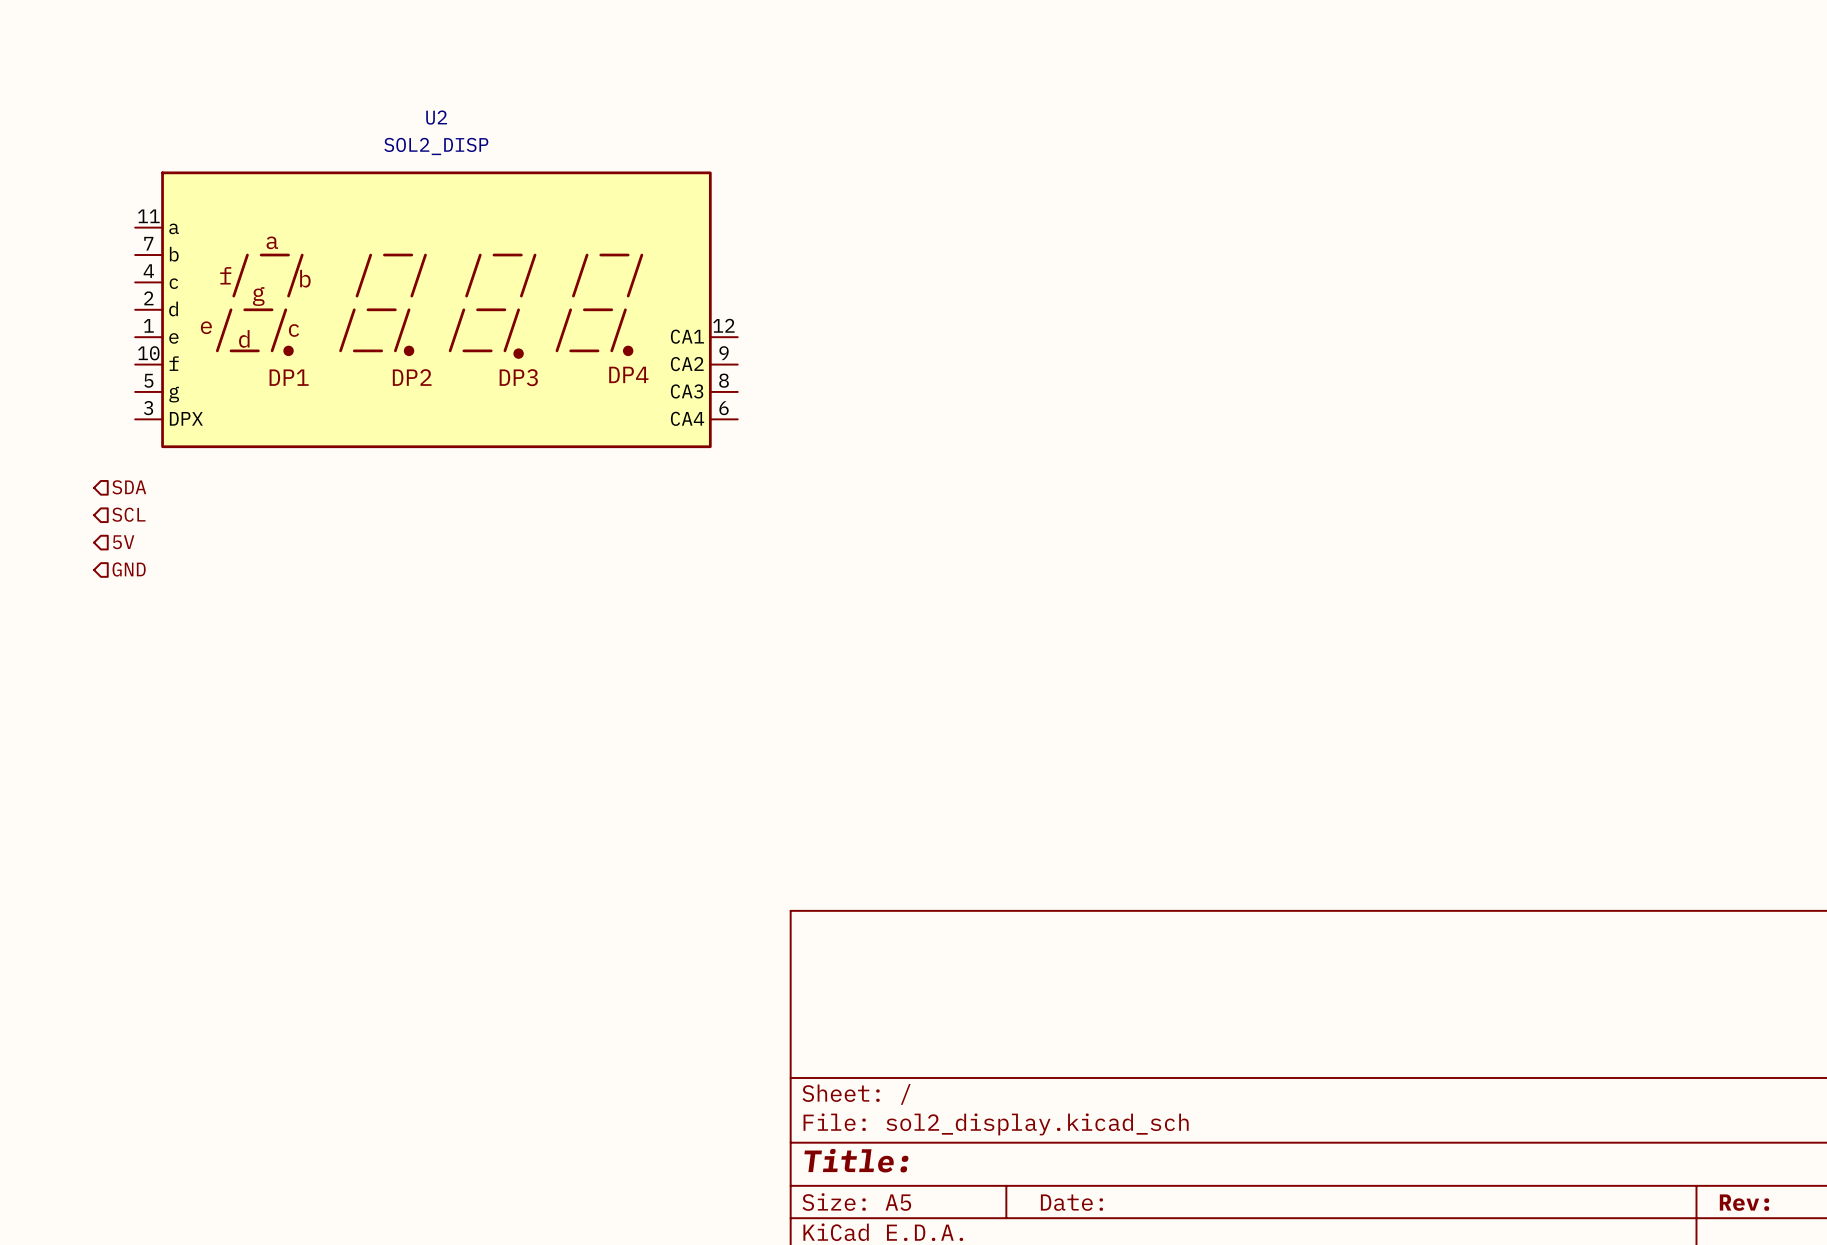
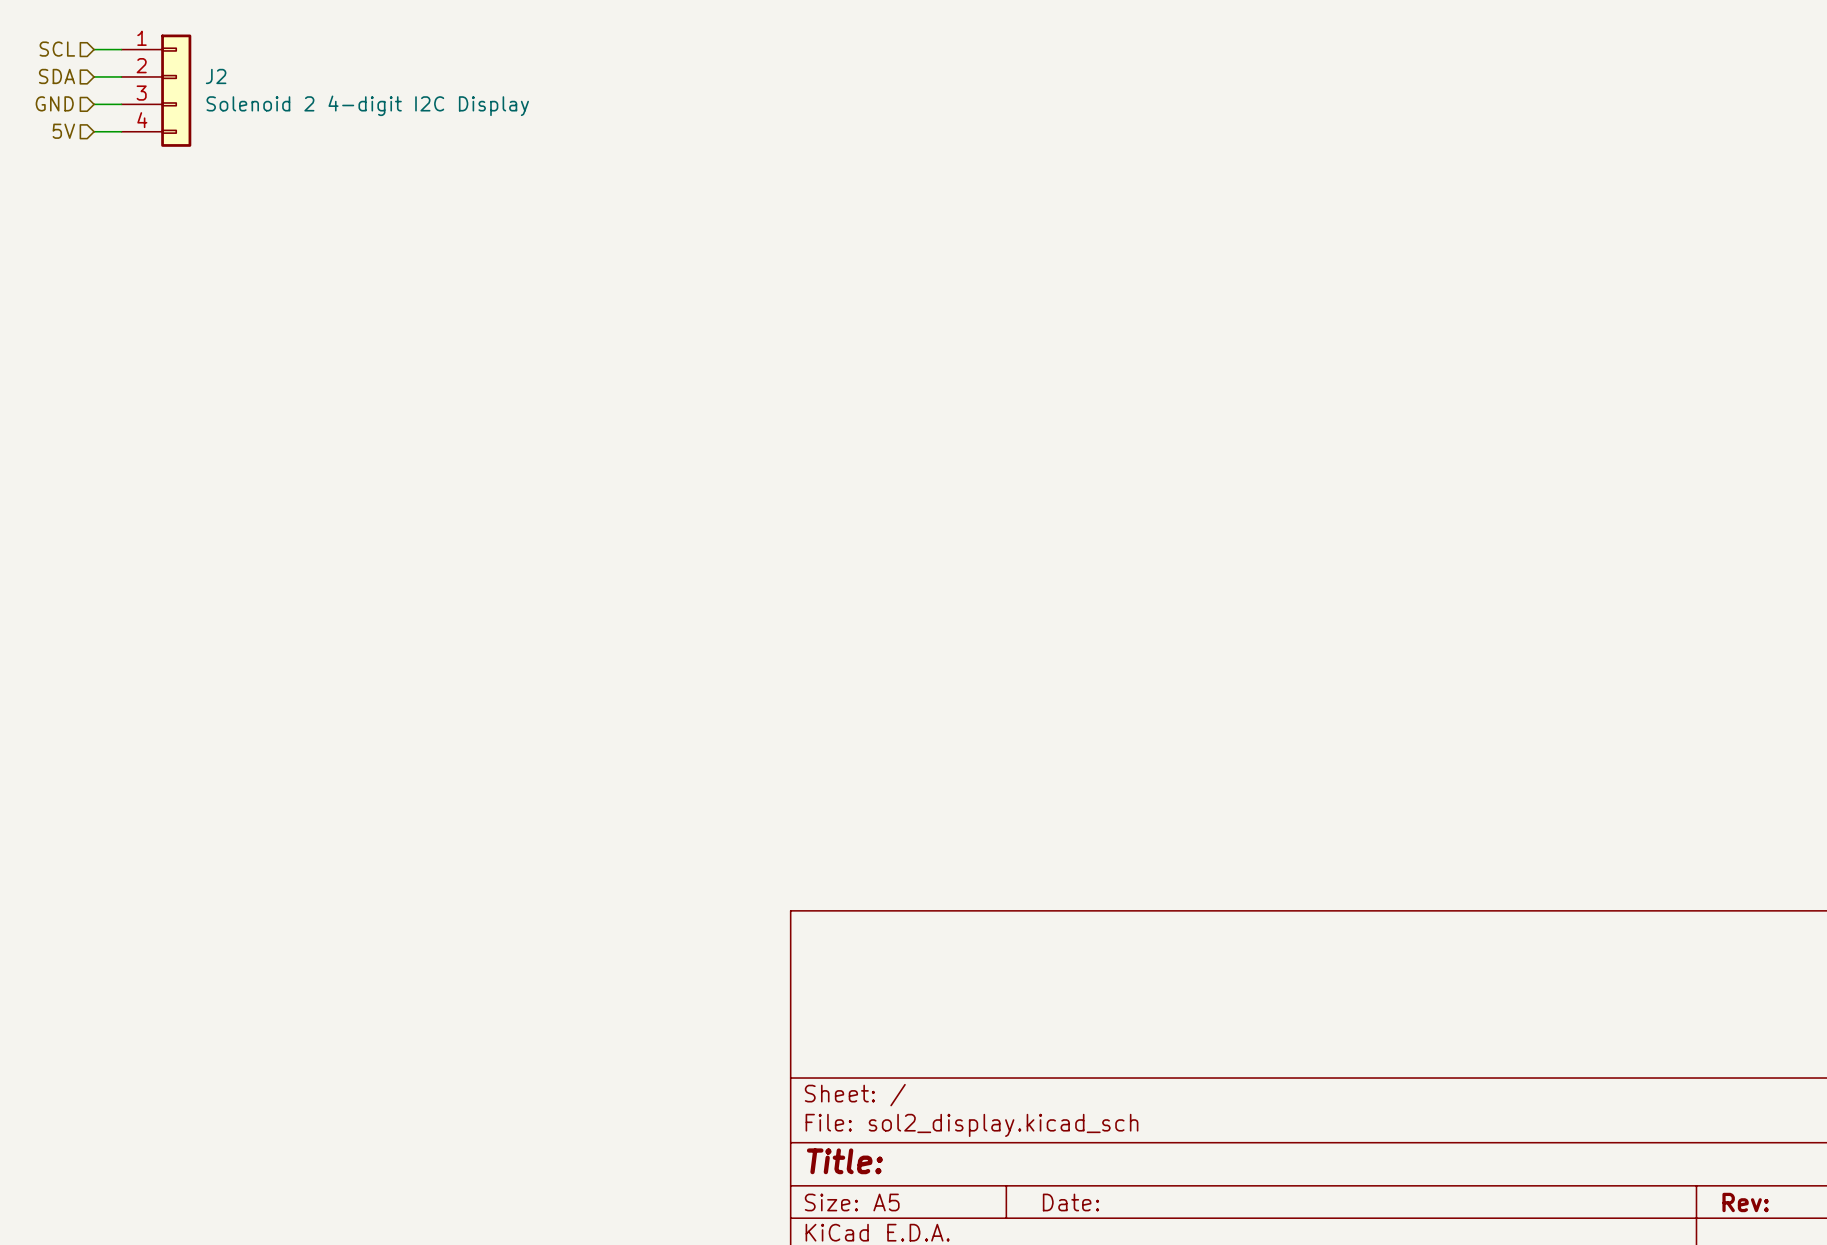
hierarchical label: none -> SCL (57, 49)
wire: none -> (94, 49) (121, 49)
hierarchical label: none -> SDA (57, 76)
wire: none -> (94, 76) (121, 76)
J2: none -> Solenoid 2 4-digit I2C Display (156, 90)
hierarchical label: none -> GND (54, 103)
wire: none -> (94, 104) (121, 104)
hierarchical label: none -> 5V (63, 131)
wire: none -> (94, 131) (121, 131)
U2: SOL2_DISP (436, 309) -> none
hierarchical label: SDA (129, 487) -> none
hierarchical label: SCL (128, 514) -> none
hierarchical label: 5V (123, 542) -> none
hierarchical label: GND (129, 569) -> none

